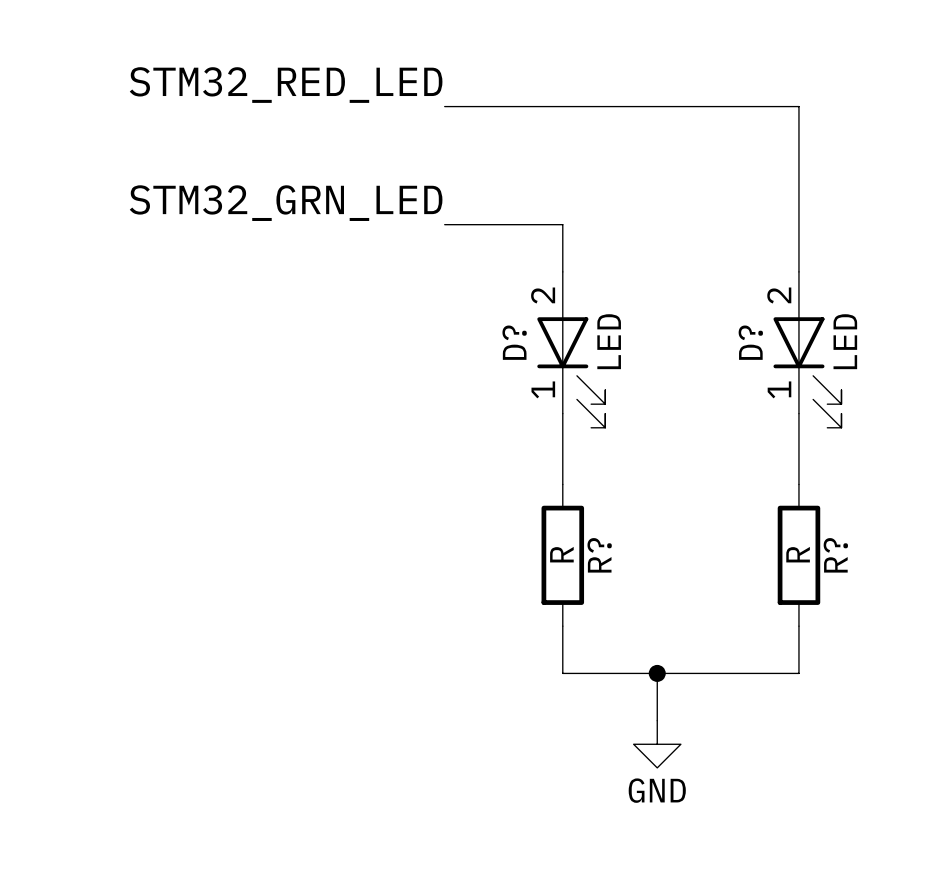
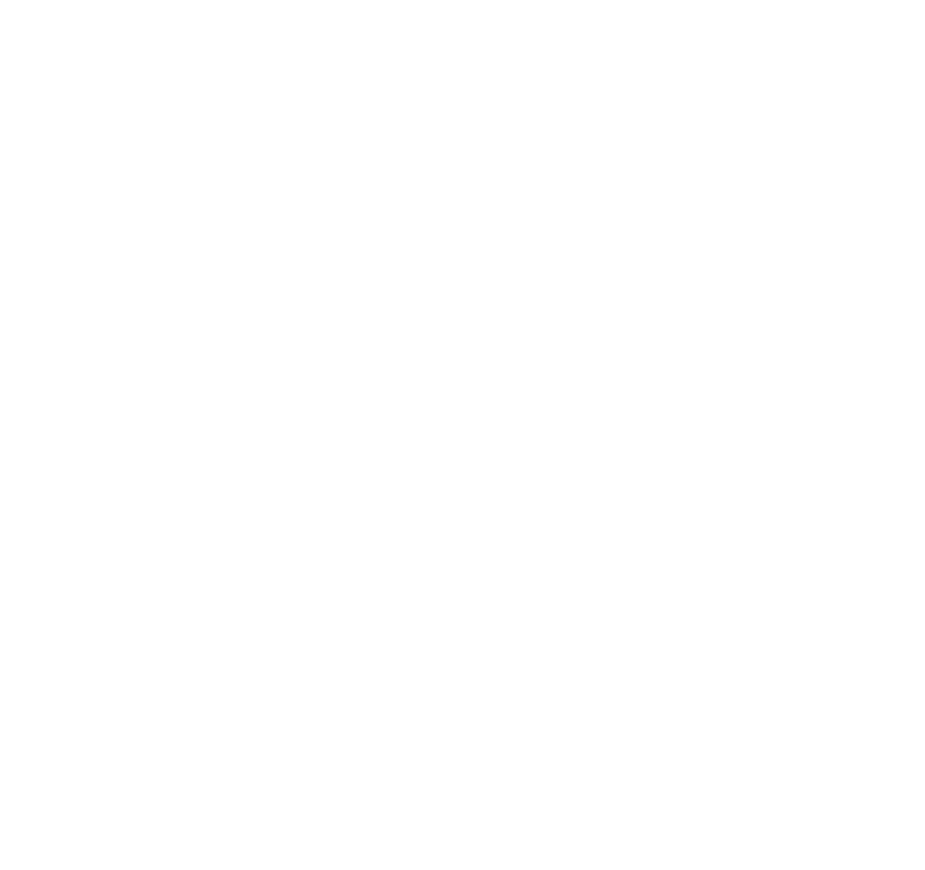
label: STM32_RED_LED (286, 85) -> none
wire: (444, 106) (798, 106) (798, 271) -> none
label: STM32_GRN_LED (286, 203) -> none
wire: (444, 224) (562, 224) (562, 271) -> none
D?: LED (571, 349) -> none
D?: LED (807, 349) -> none
wire: (562, 413) (562, 484) -> none
wire: (798, 413) (798, 484) -> none
R?: R (562, 555) -> none
R?: R (798, 555) -> none
wire: (562, 626) (562, 673) (798, 673) (798, 626) -> none
wire: (657, 673) (657, 720) -> none
junction: (657, 673) -> none
power symbol: GND (657, 744) -> none

